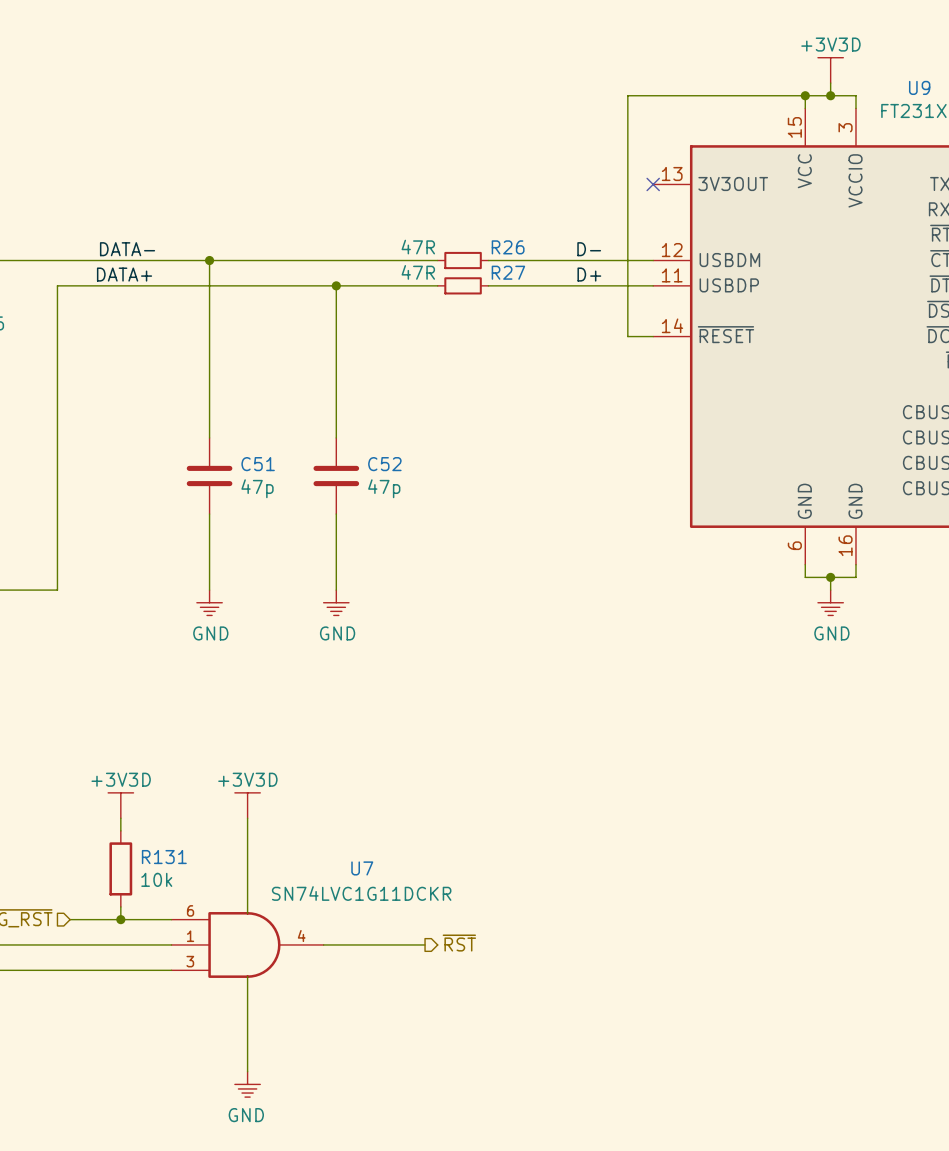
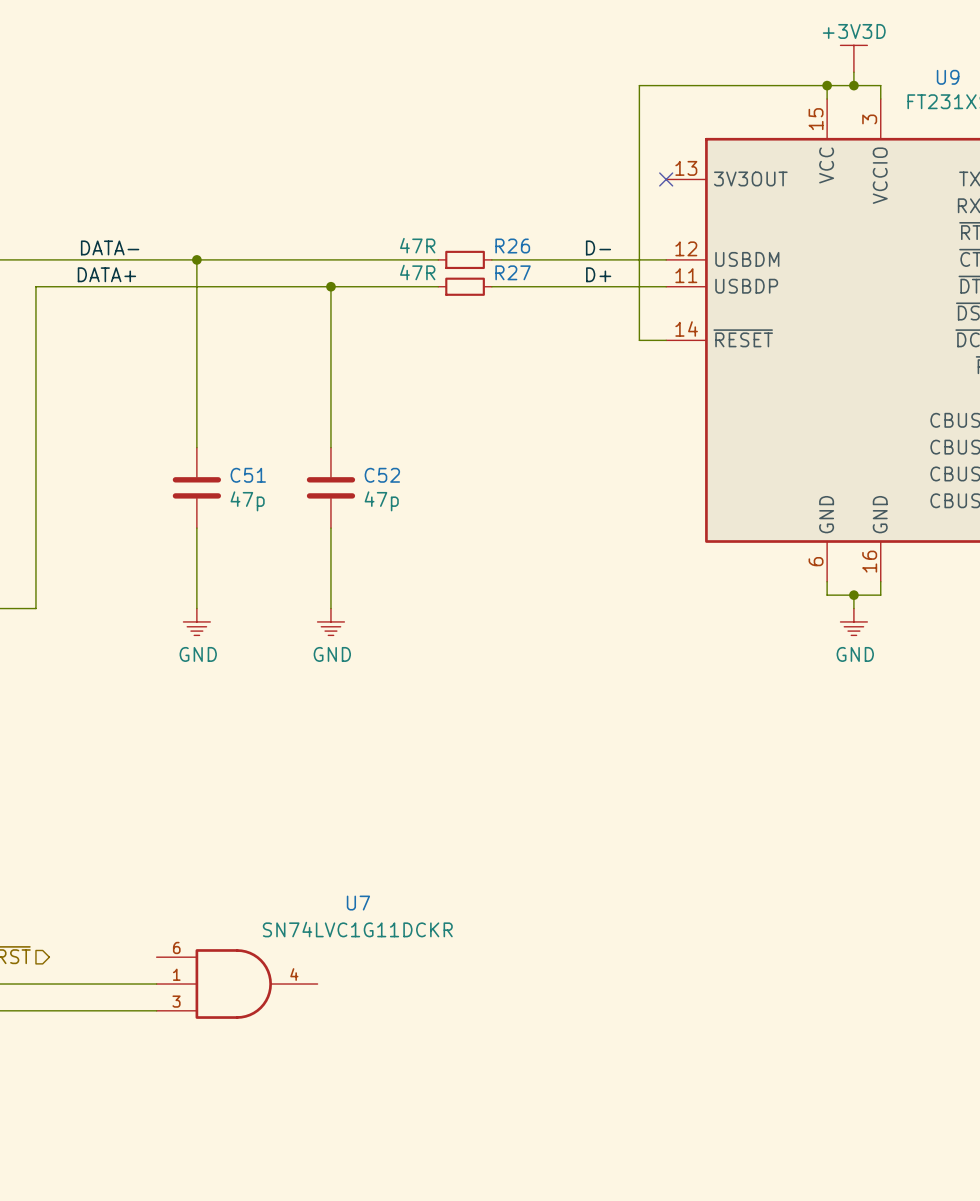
power symbol: +3V3D (120, 805) -> none
power symbol: +3V3D (247, 805) -> none
wire: (120, 818) (120, 830) -> none
wire: (247, 818) (247, 913) -> none
R131: 10k (120, 868) -> none
wire: (120, 906) (120, 919) -> none
wire: (70, 919) (171, 919) -> none
junction: (120, 919) -> none
hierarchical label: ~{RST} (459, 943) -> none
wire: (323, 944) (425, 944) -> none
wire: (247, 976) (247, 1071) -> none
power symbol: GND (247, 1084) -> none

